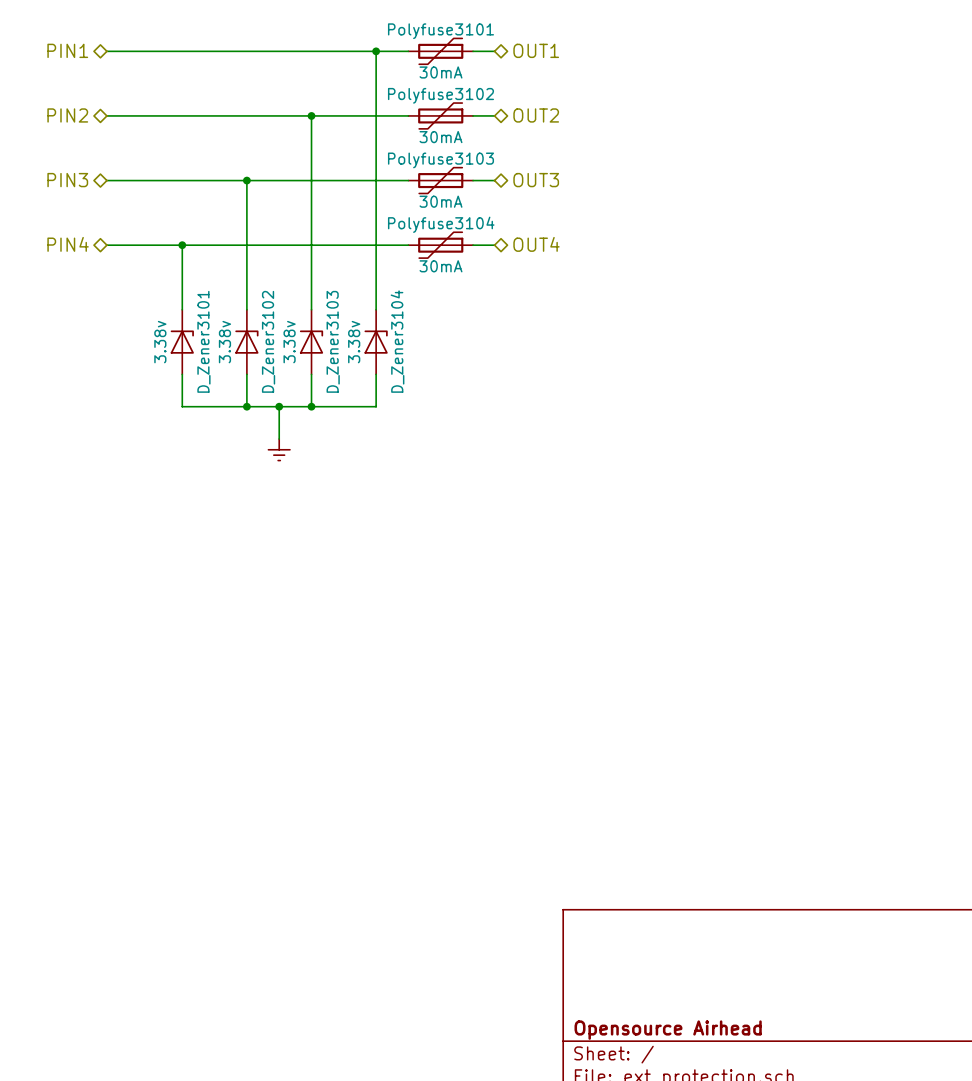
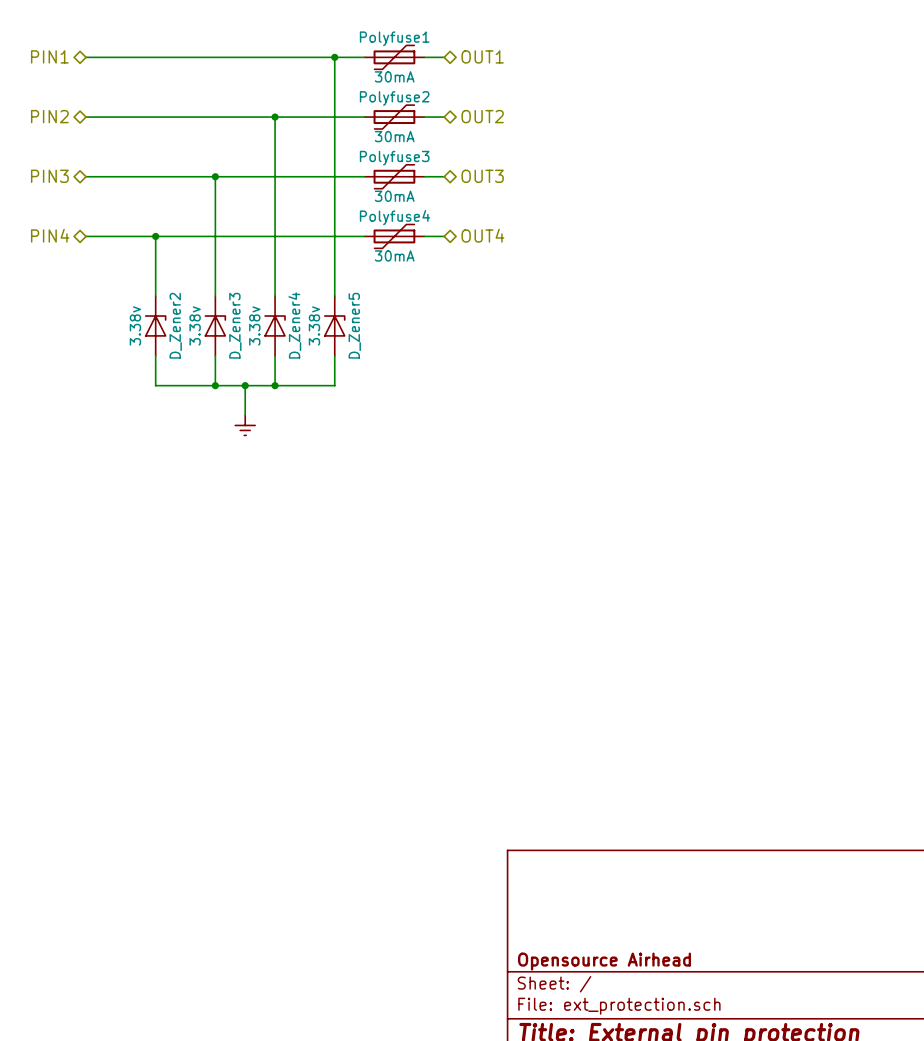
Polyfuse3101 name: Polyfuse3101 (440, 31) -> Polyfuse1 (394, 38)
Polyfuse3102 name: Polyfuse3102 (440, 95) -> Polyfuse2 (394, 98)
Polyfuse3103 name: Polyfuse3103 (440, 160) -> Polyfuse3 (394, 158)
Polyfuse3104 name: Polyfuse3104 (441, 224) -> Polyfuse4 (394, 217)
D_Zener3101 name: D_Zener3101 (203, 341) -> D_Zener2 (175, 325)
D_Zener3102 name: D_Zener3102 (268, 341) -> D_Zener3 (235, 325)
D_Zener3103 name: D_Zener3103 (333, 341) -> D_Zener4 (294, 325)
D_Zener3104 name: D_Zener3104 (397, 341) -> D_Zener5 (354, 325)

